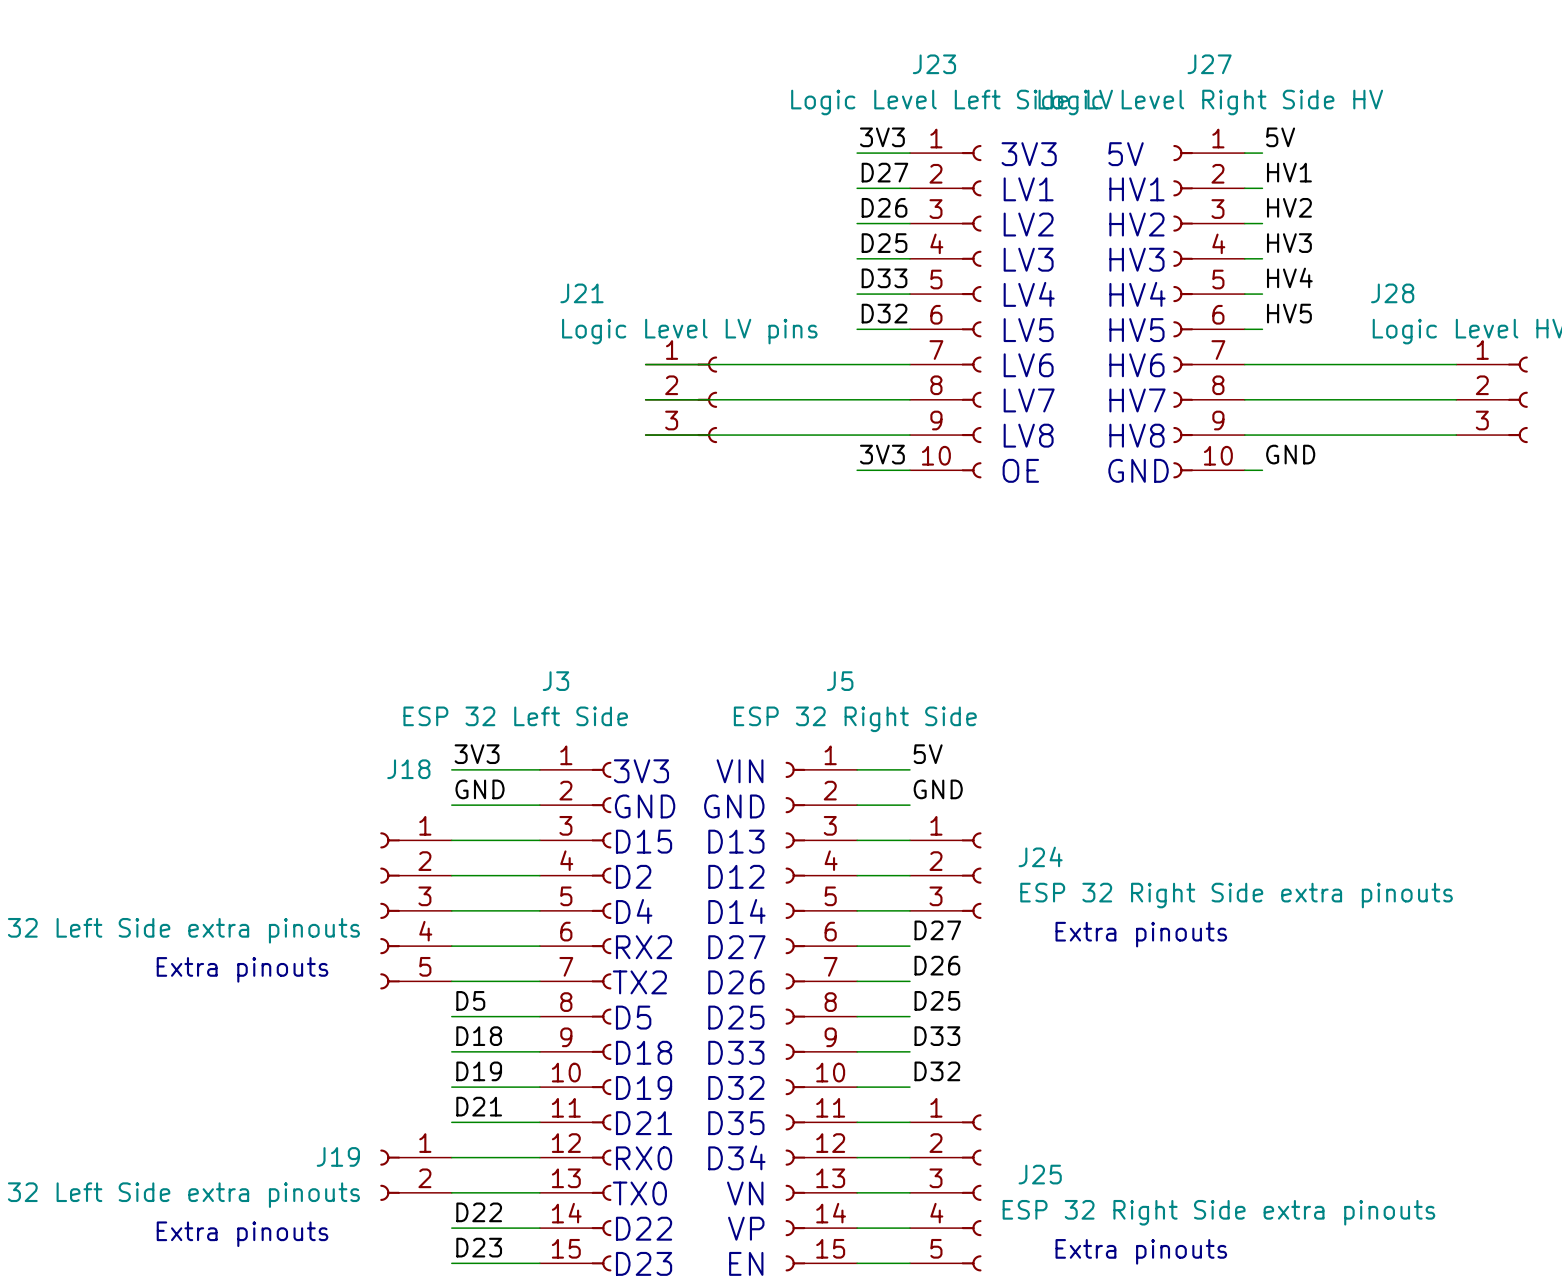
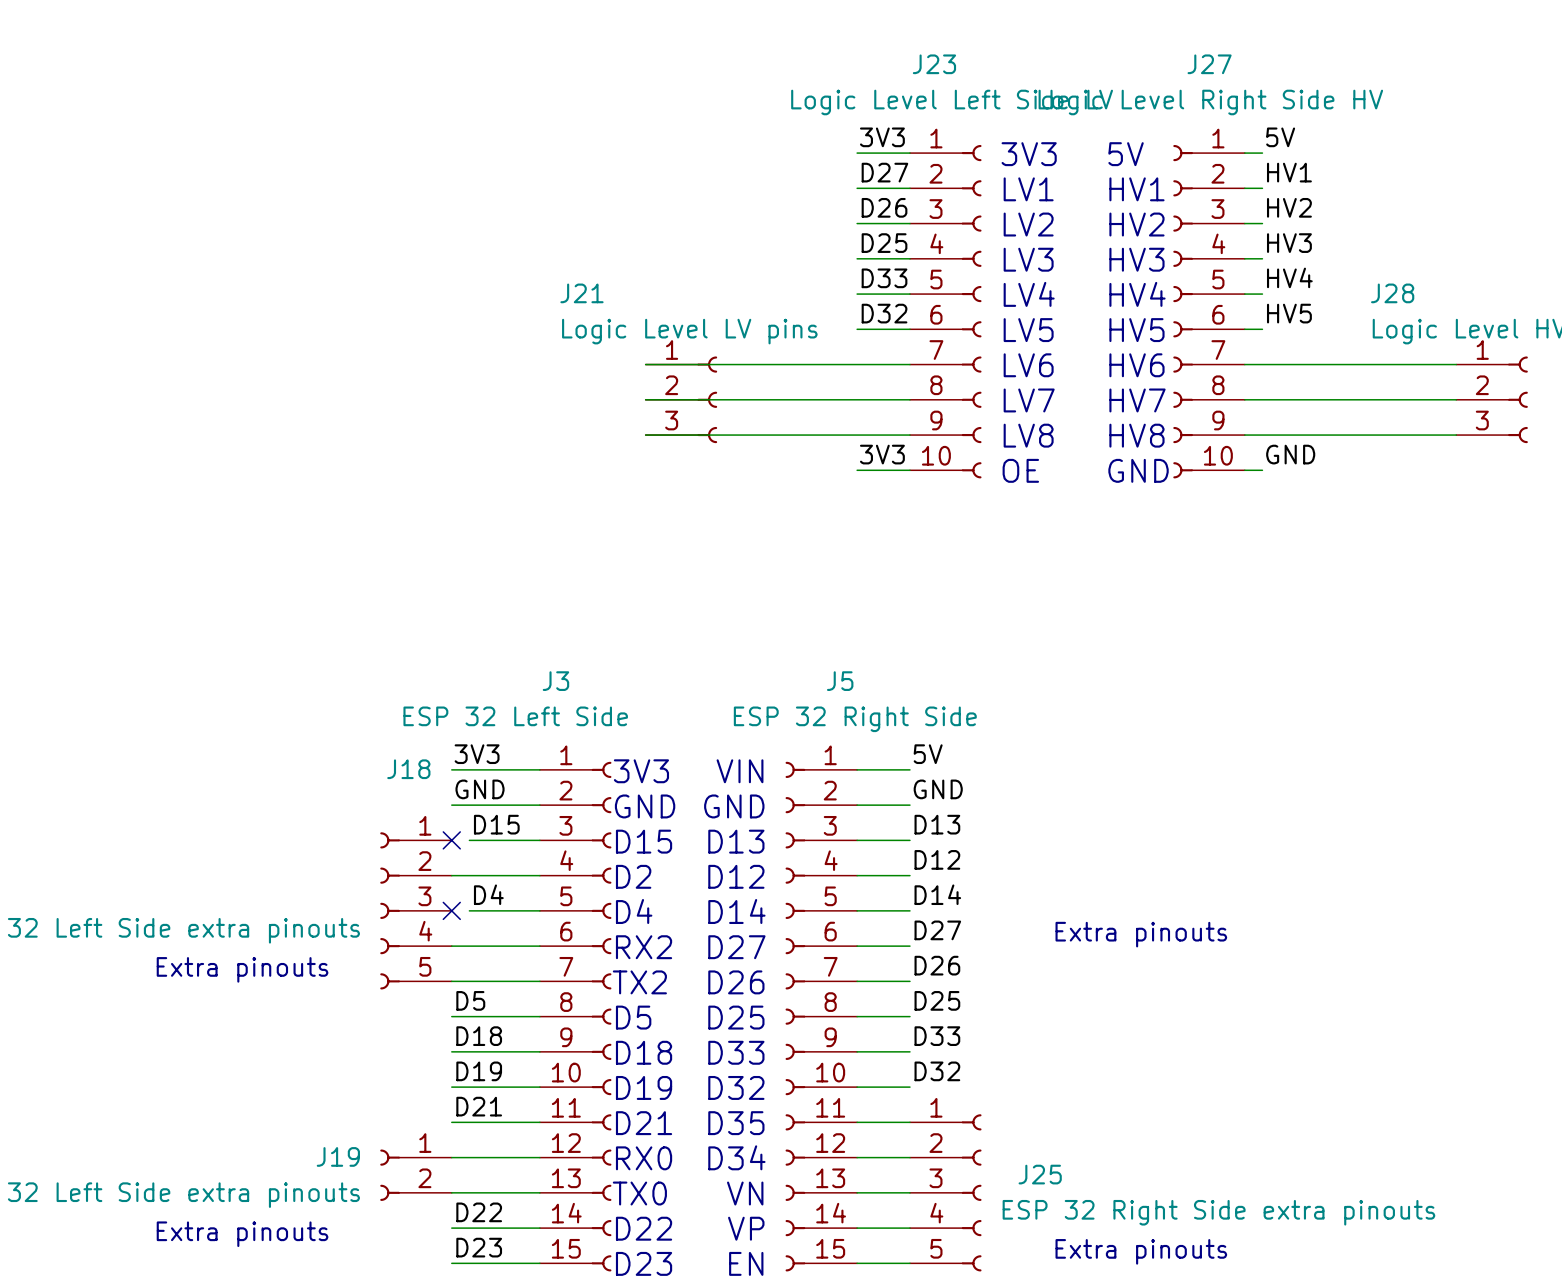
label: none -> D15 (496, 824)
label: none -> D13 (937, 824)
wire: (451, 840) (469, 840) -> none
no-connect mark: none -> (451, 840)
label: none -> D12 (937, 859)
J24: ESP 32 Right Side extra pinouts (945, 875) -> none
label: none -> D4 (488, 894)
label: none -> D14 (937, 894)
wire: (451, 910) (469, 910) -> none
no-connect mark: none -> (451, 910)

